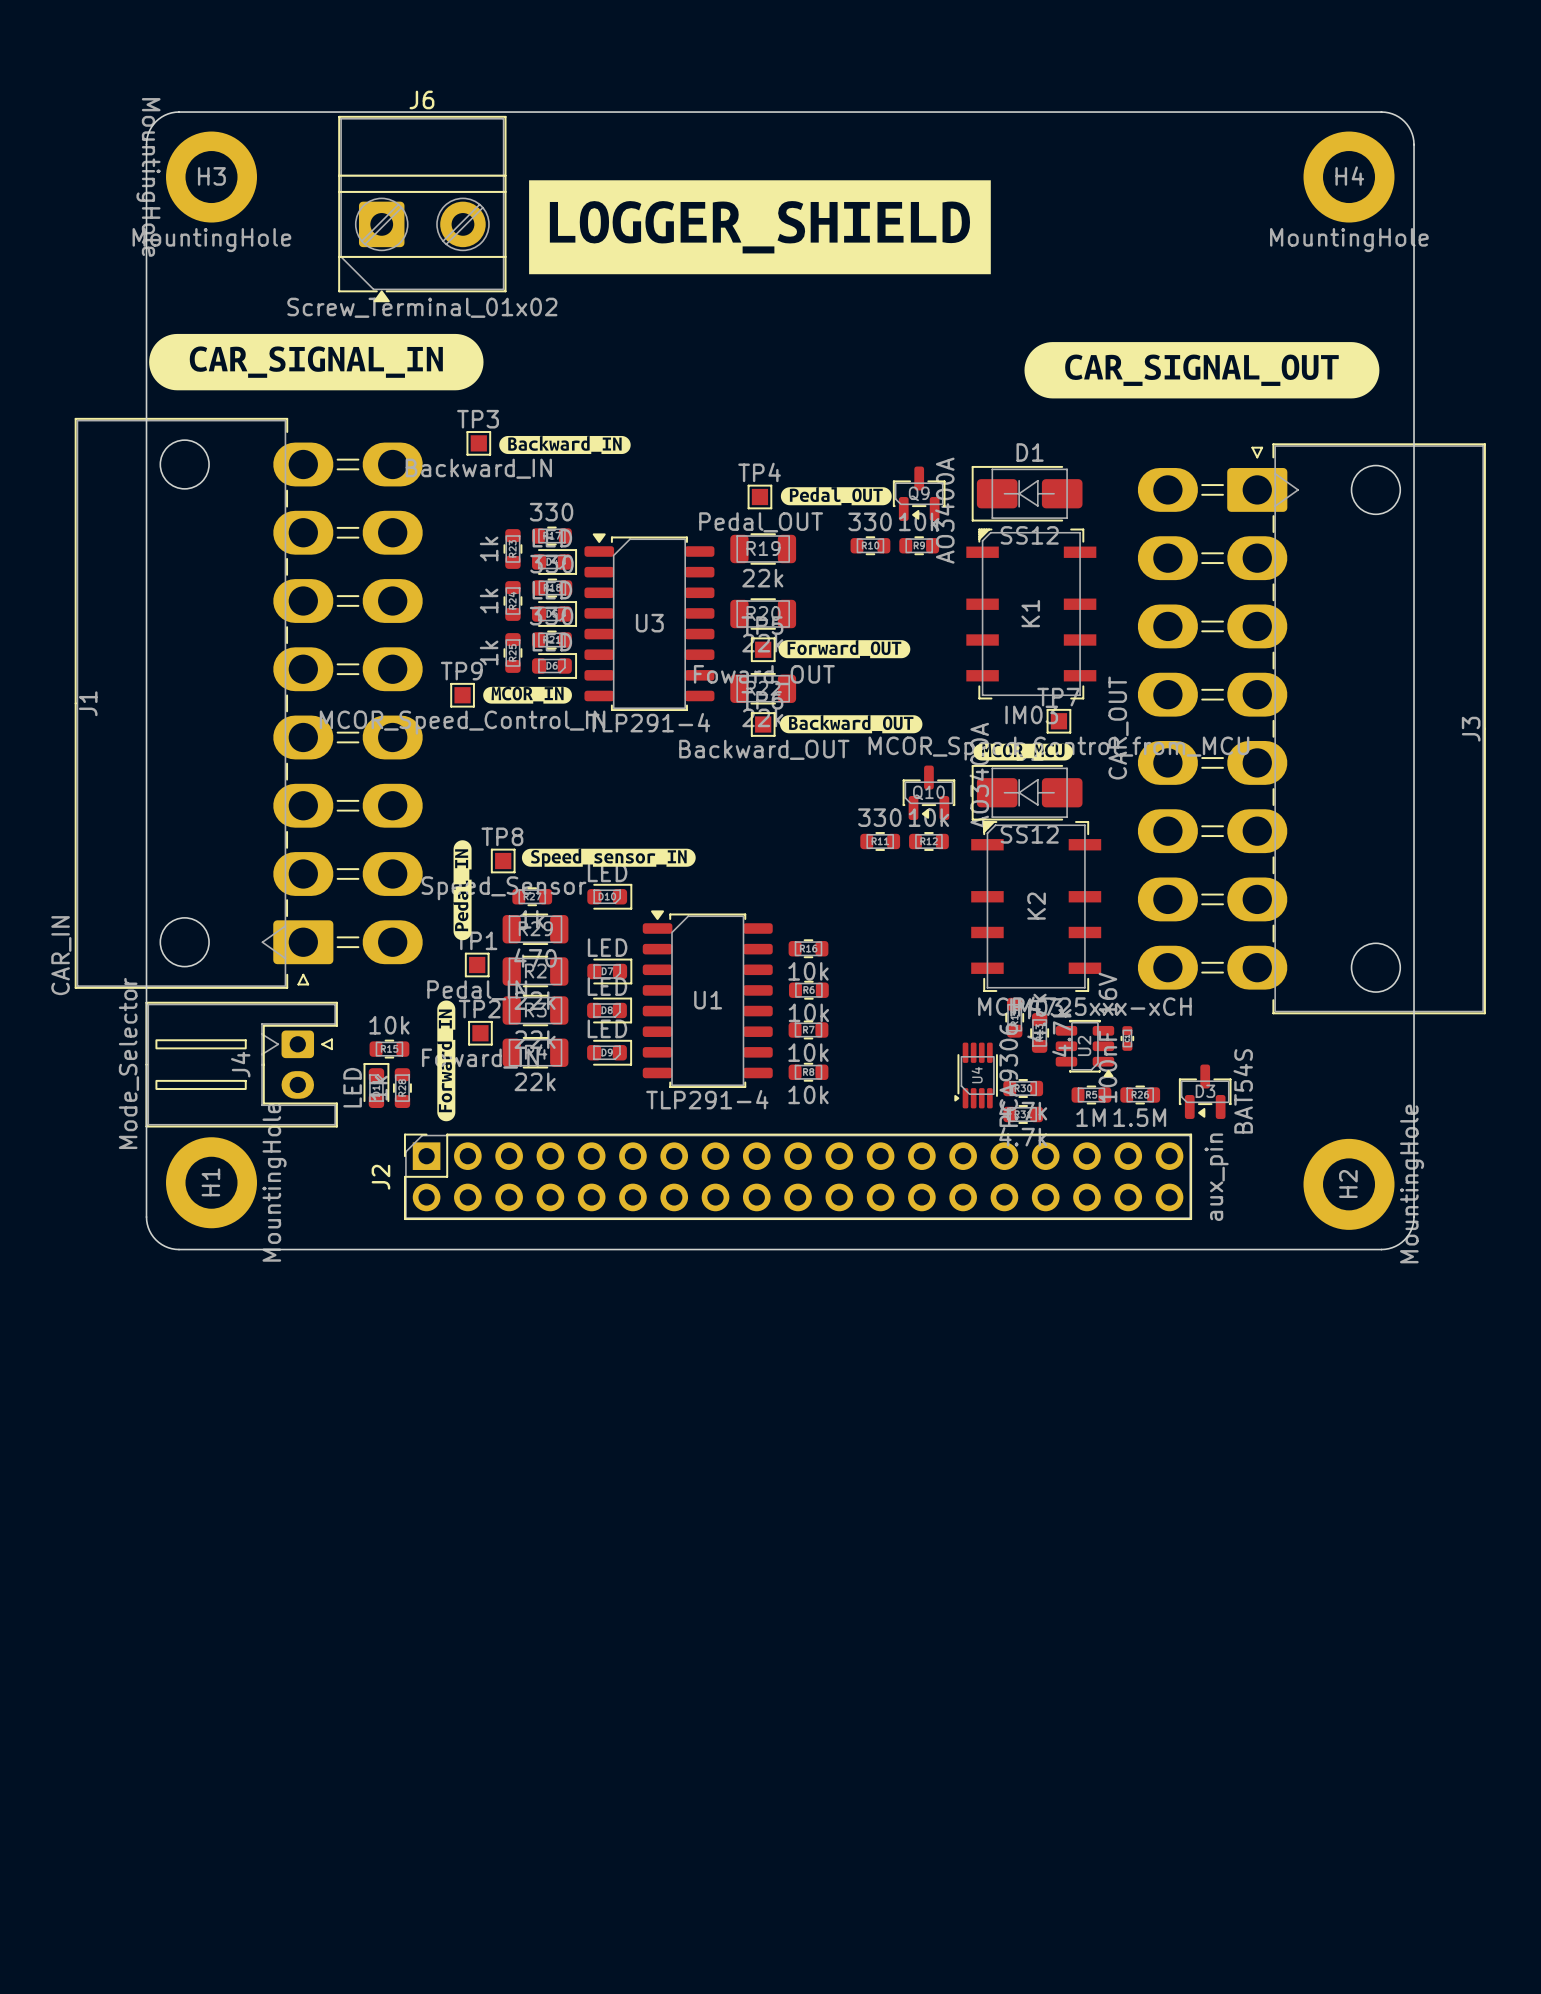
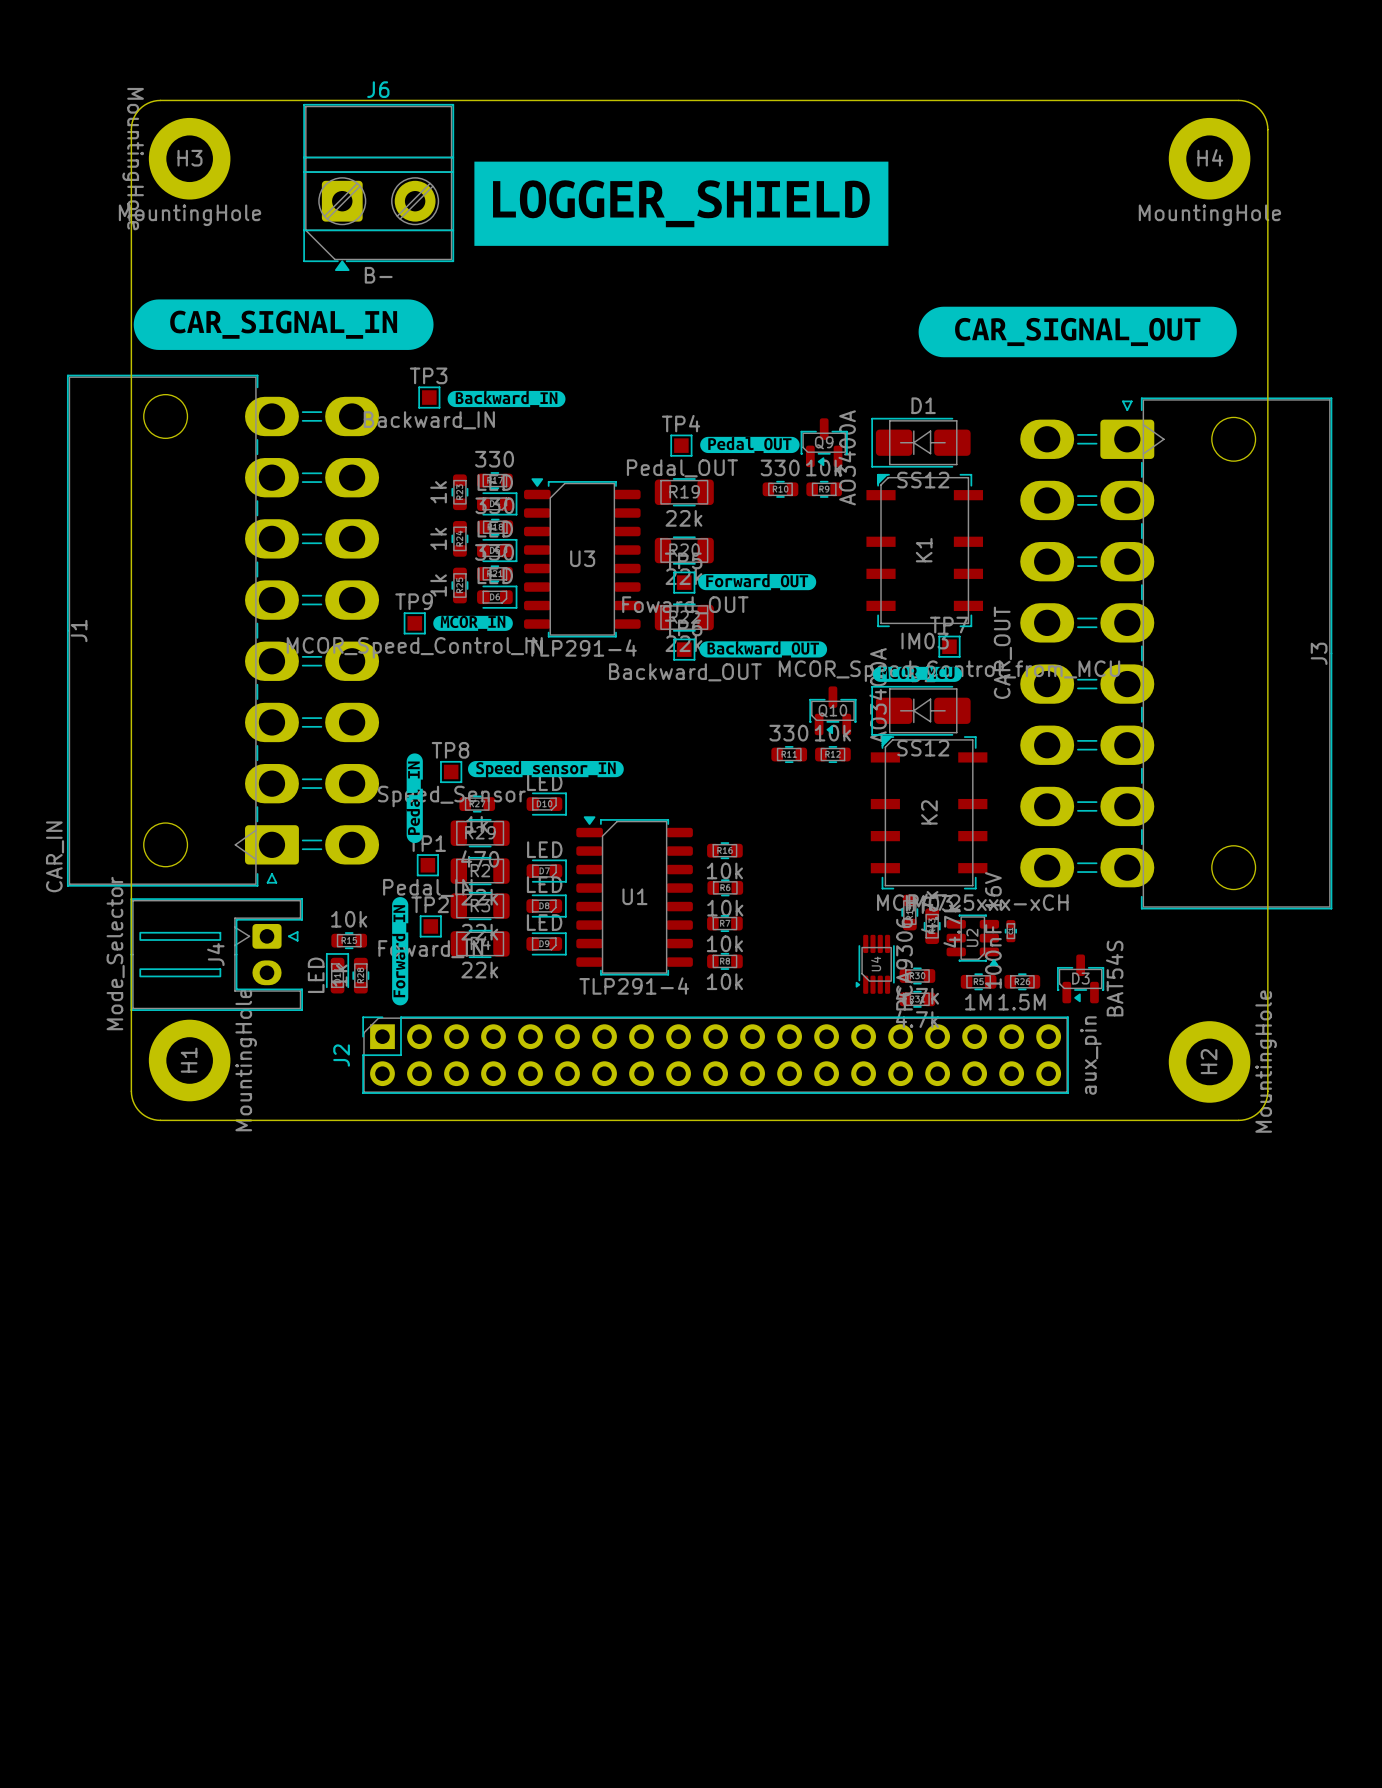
J6 value: Screw_Terminal_01x02 (422, 307) -> B- (378, 275)

